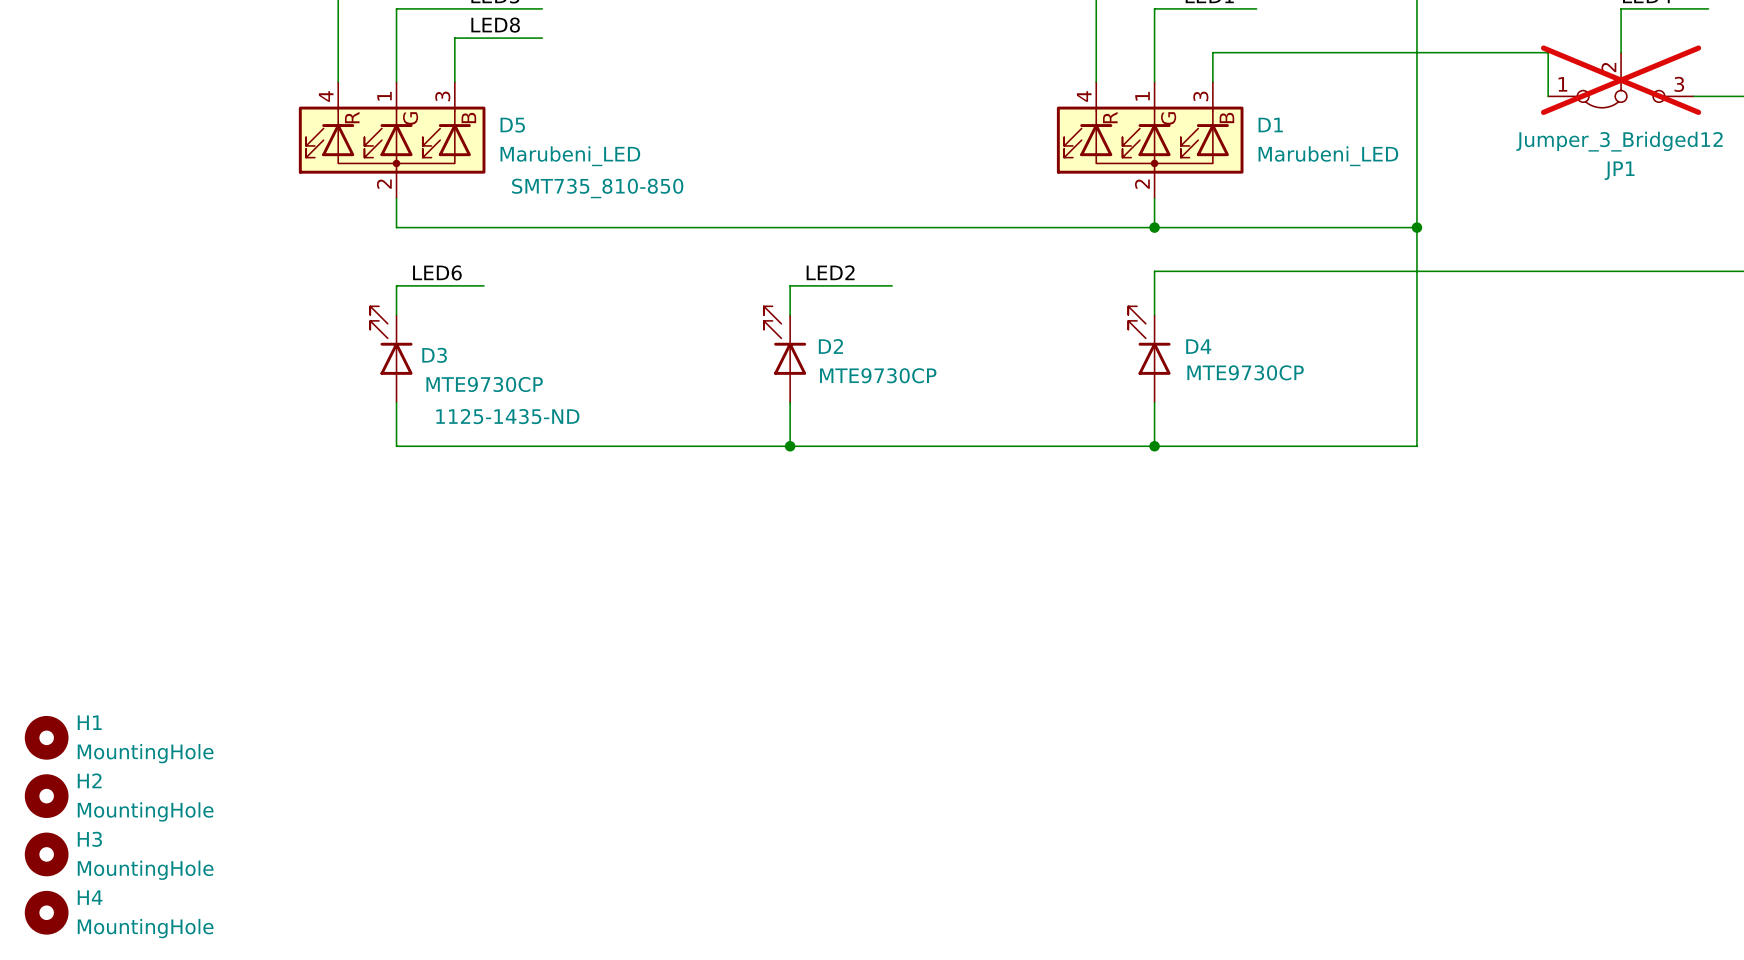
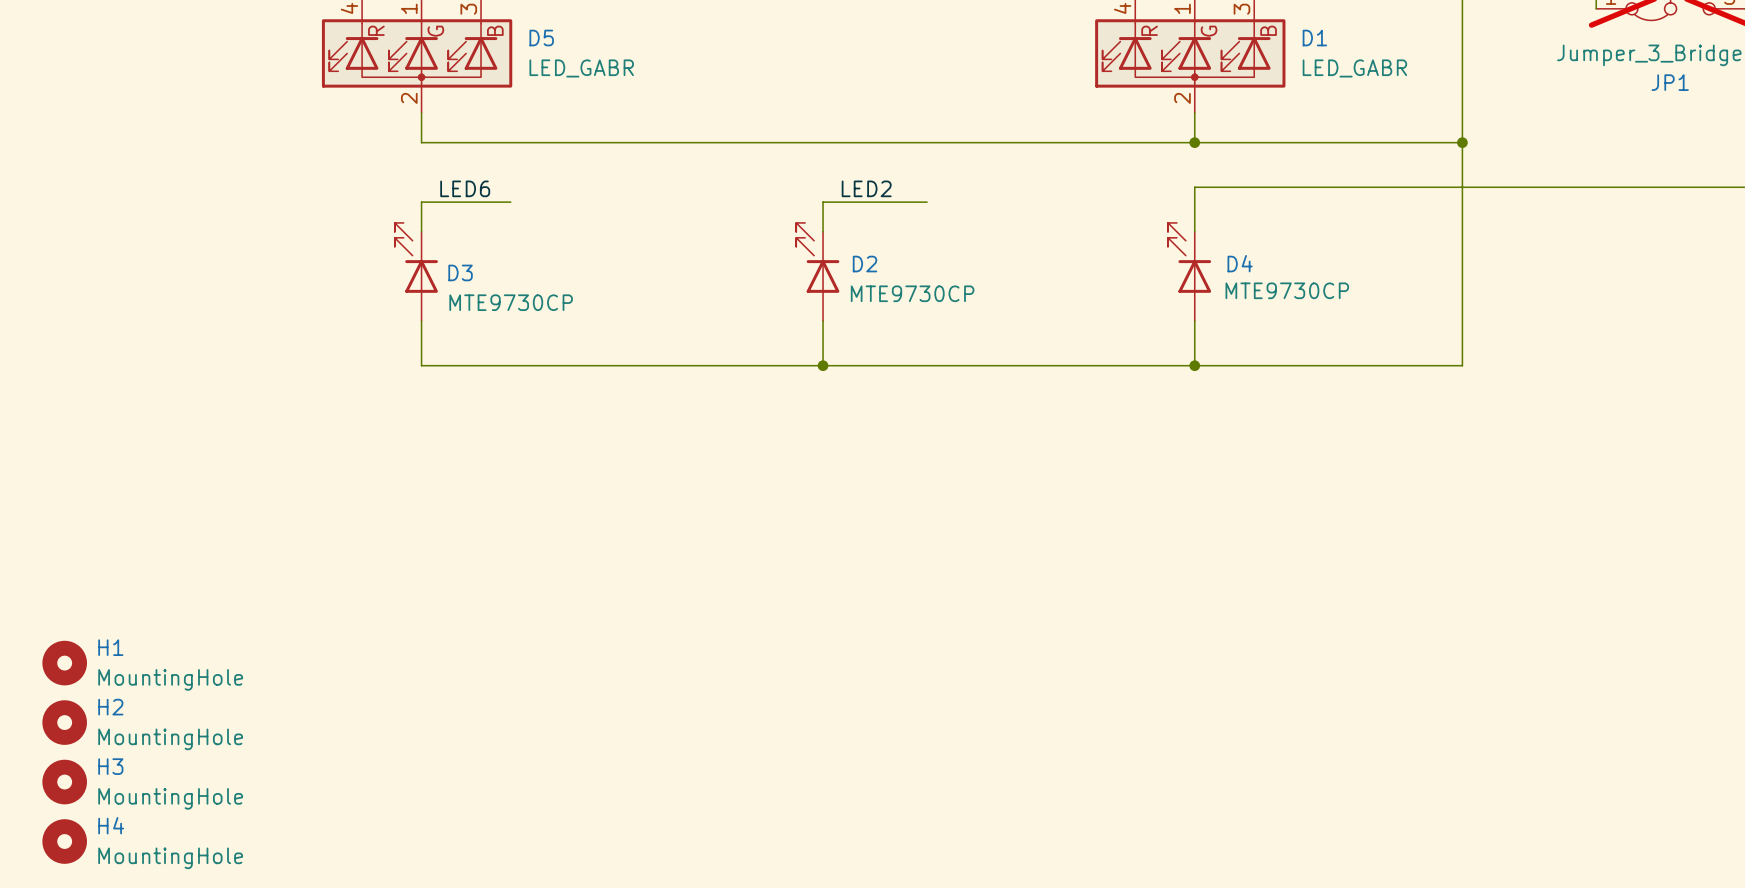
D5 value: Marubeni_LED (570, 156) -> LED_GABR (581, 68)
D1 value: Marubeni_LED (1328, 156) -> LED_GABR (1354, 68)
D5 text: SMT735_810-850 (597, 188) -> none
D3 text: 1125-1435-ND (507, 416) -> none

